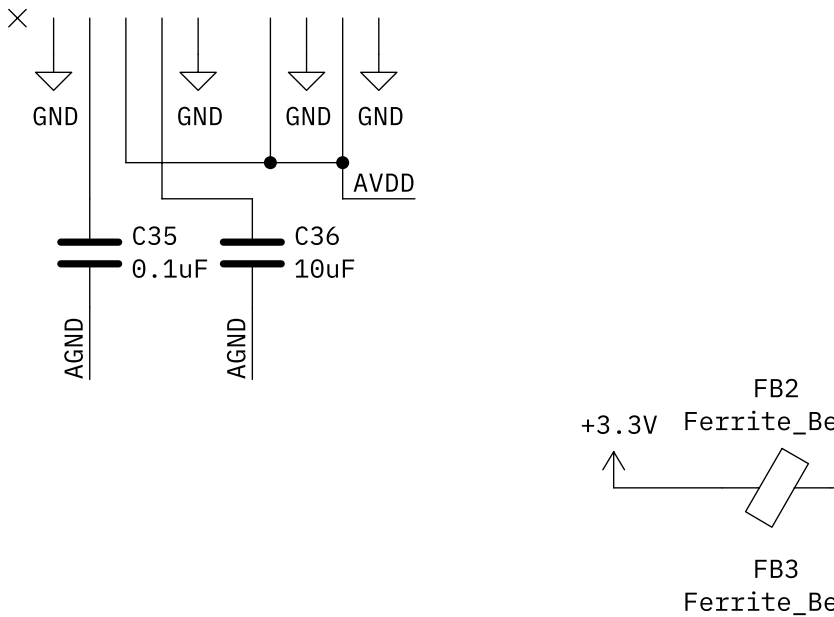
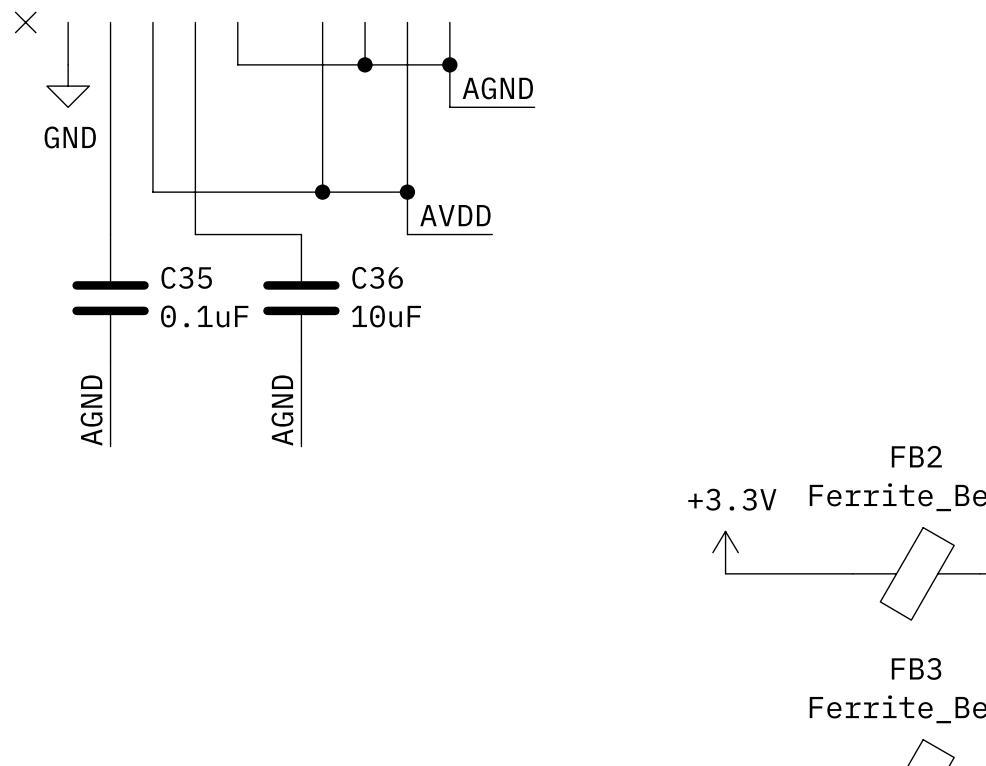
wire: none -> (237, 64) (449, 64) (449, 107) (534, 107)
junction: none -> (365, 64)
junction: none -> (449, 64)
power symbol: GND (198, 72) -> none
power symbol: GND (306, 72) -> none
power symbol: GND (378, 72) -> none
label: none -> AGND (497, 88)

